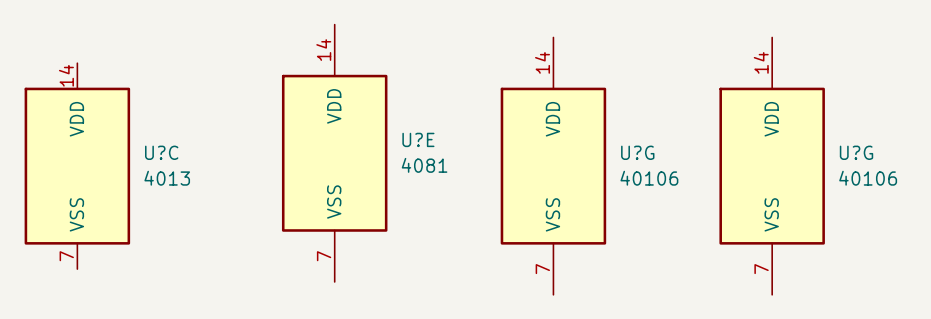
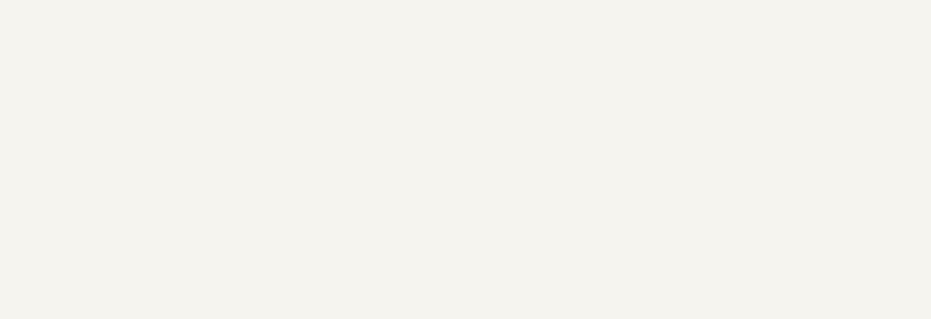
U?E: 4081 (334, 153) -> none
U?C: 4013 (77, 166) -> none
U?G: 40106 (553, 166) -> none
U?G: 40106 (772, 166) -> none

